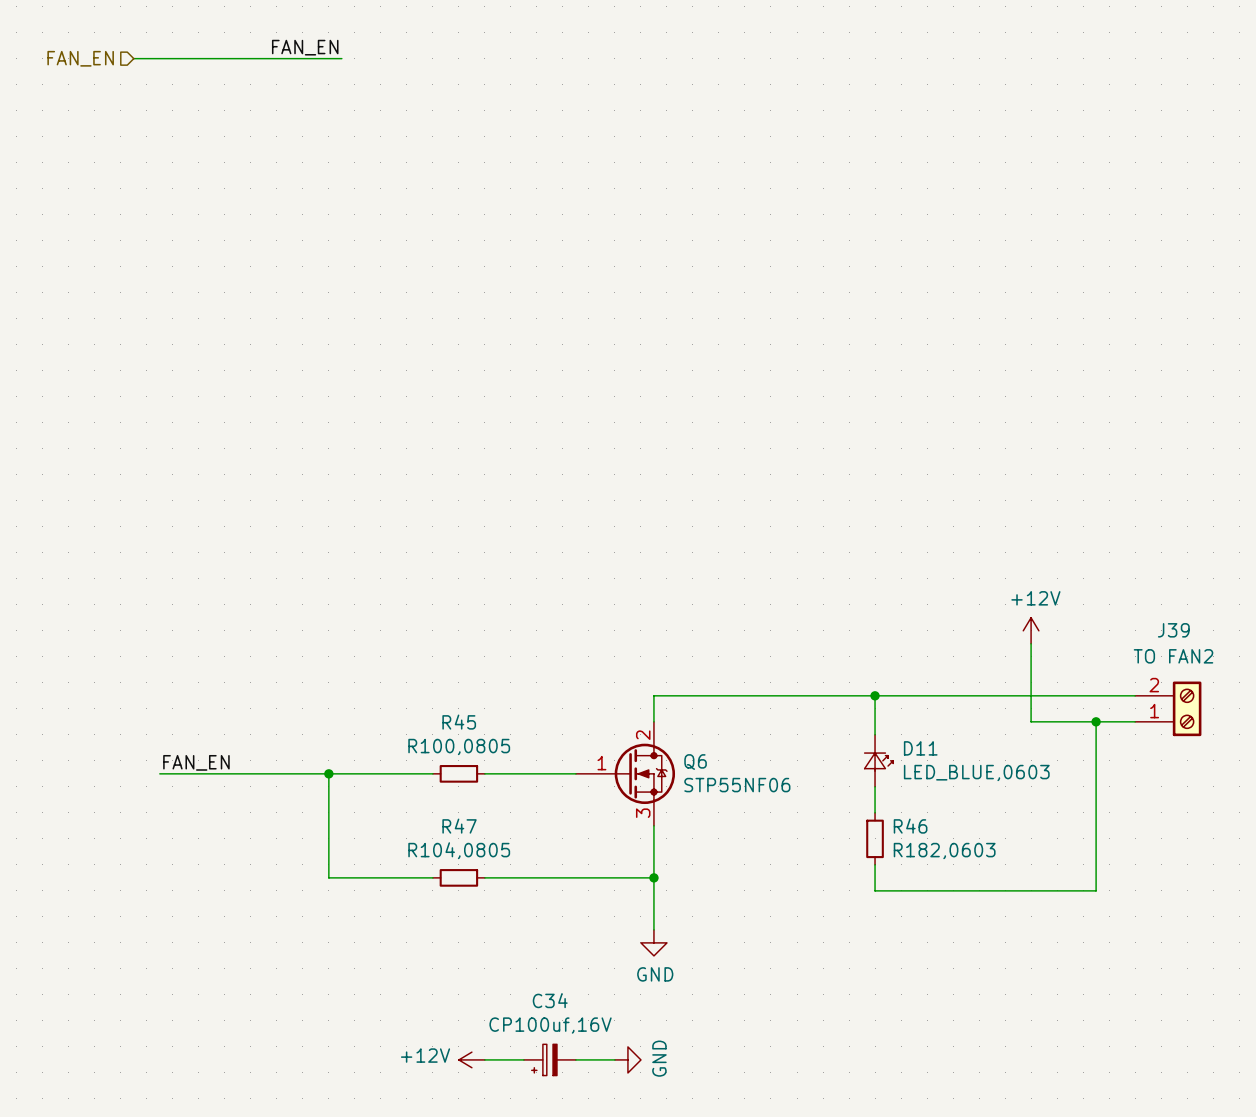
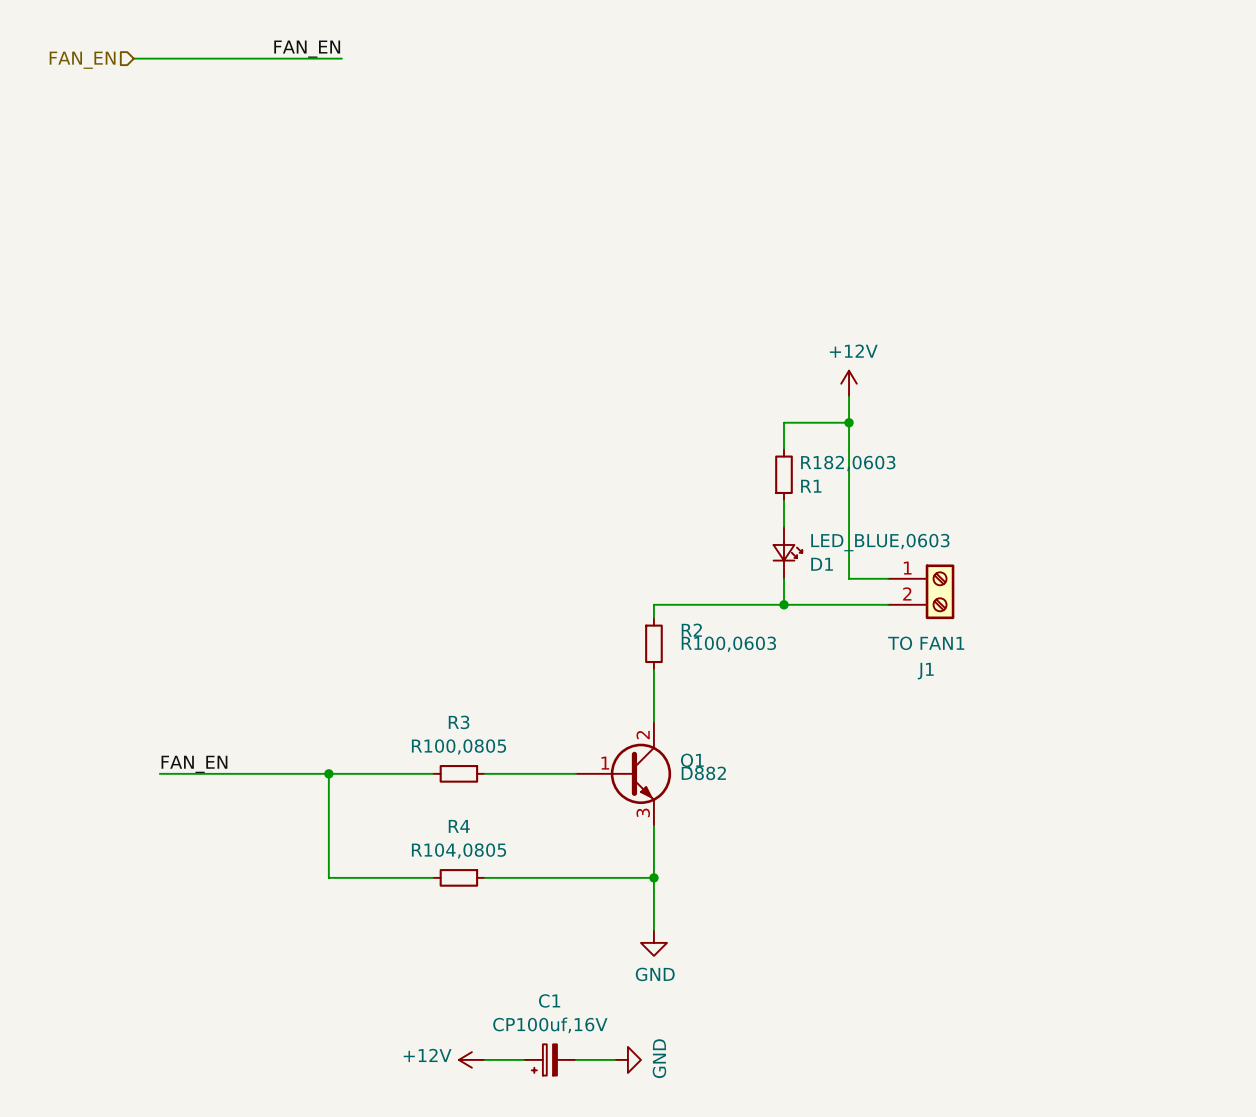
power symbol: none -> +12V (849, 383)
wire: none -> (849, 396) (849, 578) (888, 578)
wire: none -> (849, 422) (784, 422) (784, 448)
junction: none -> (849, 422)
R1: none -> R182,0603 (784, 474)
wire: none -> (784, 500) (784, 526)
D1: none -> LED_BLUE,0603 (787, 552)
J1: none -> TO FAN1 (921, 591)
junction: none -> (784, 604)
wire: none -> (888, 604) (653, 604) (653, 617)
power symbol: +12V (1031, 630) -> none
R2: none -> R100,0603 (653, 643)
wire: (1031, 643) (1031, 721) (1135, 721) -> none
wire: (653, 695) (1135, 695) -> (653, 695) (653, 669)
wire: (875, 695) (875, 734) -> none
junction: (875, 695) -> none
J39: TO FAN2 (1168, 708) -> none
wire: (1096, 721) (1096, 890) (875, 890) (875, 864) -> none
junction: (1096, 721) -> none
R45 name: R45 (459, 722) -> R3 (459, 722)
D11: LED_BLUE,0603 (878, 760) -> none
Q1: none -> D882 (623, 773)
Q6: STP55NF06 (625, 773) -> none
wire: (875, 786) (875, 812) -> (784, 578) (784, 604)
R47 name: R47 (459, 826) -> R4 (459, 826)
R46: R182,0603 (875, 838) -> none
C34 name: C34 (550, 1000) -> C1 (549, 1000)

